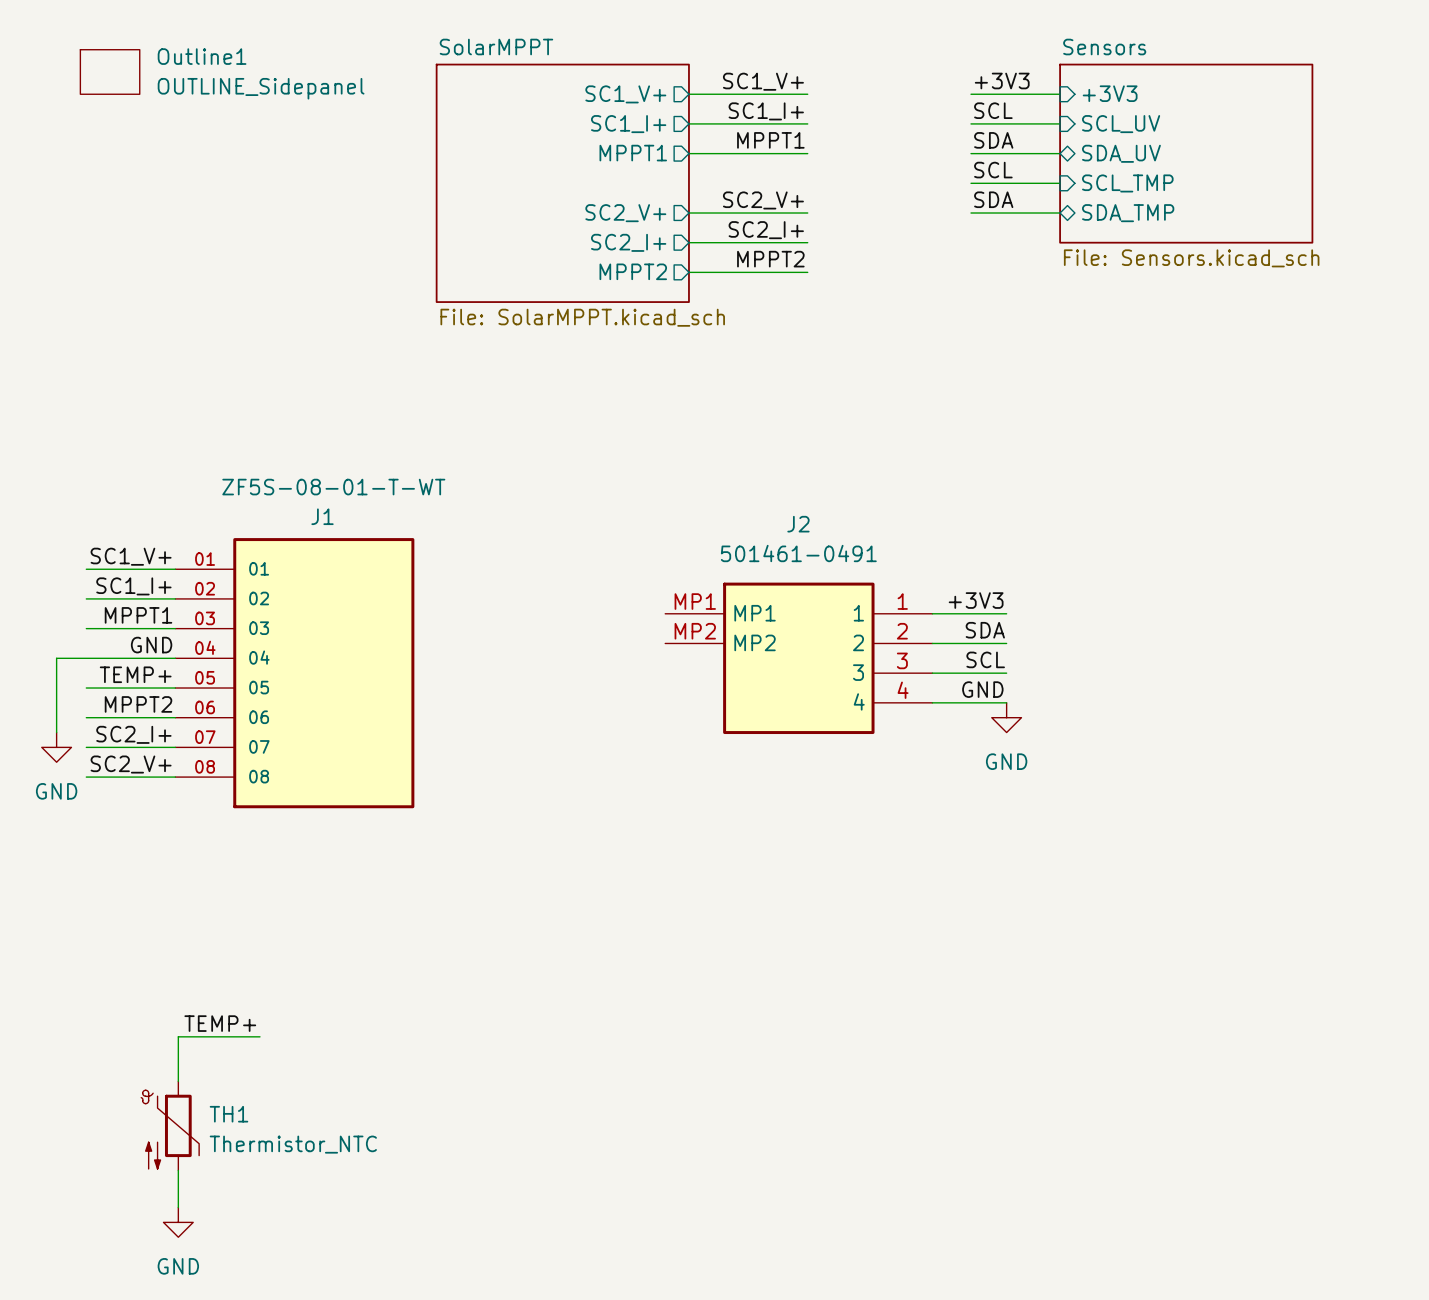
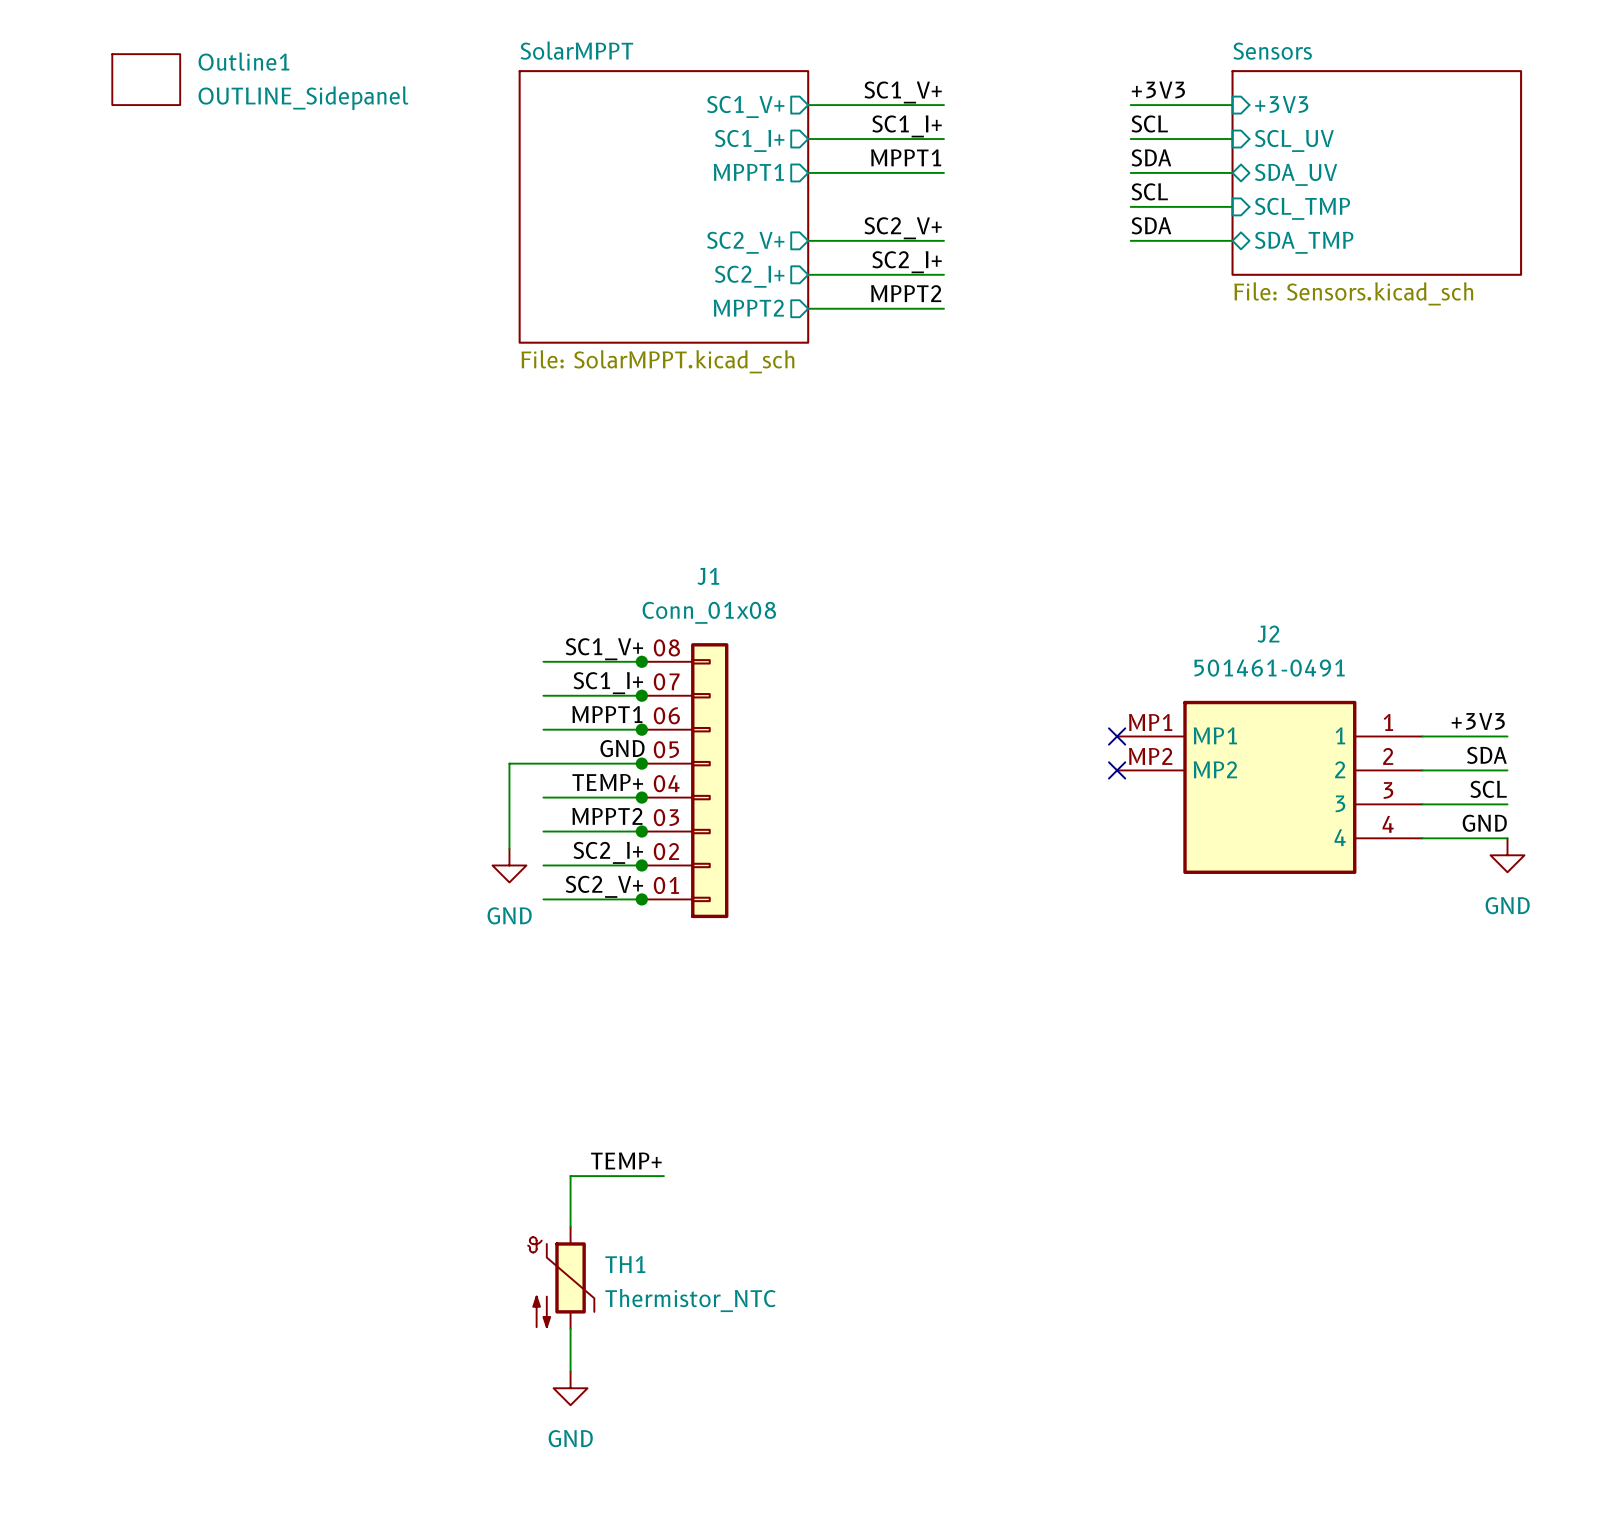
J1 value: ZF5S-08-01-T-WT (333, 487) -> Conn_01x08 (709, 612)
J1 name position: J1 (322, 516) -> J1 (708, 576)
J1 symbol: [175, 538, 415, 809] -> [641, 643, 729, 919]
label: SC1_V+ (131, 556) -> none
label: none -> SC1_V+ (604, 649)
wire: (86, 569) (175, 569) -> none
wire: none -> (543, 661) (645, 661)
junction: none -> (641, 661)
label: SC1_I+ (133, 586) -> none
wire: (86, 598) (175, 598) -> none
label: none -> SC1_I+ (608, 683)
label: +3V3 (976, 600) -> none
wire: none -> (543, 695) (645, 695)
junction: none -> (641, 695)
wire: (932, 613) (1006, 613) -> none
label: MPPT1 (138, 615) -> none
label: none -> MPPT1 (607, 714)
wire: (86, 628) (175, 628) -> none
label: SDA (985, 630) -> none
label: none -> +3V3 (1478, 721)
wire: none -> (543, 729) (645, 729)
junction: none -> (641, 729)
wire: (932, 643) (1006, 643) -> none
label: GND (151, 645) -> none
no-connect mark: none -> (1117, 736)
wire: none -> (1422, 736) (1507, 736)
label: none -> GND (622, 748)
wire: (175, 658) (56, 658) (56, 732) -> none
part: (798, 658) -> none
label: SCL (985, 659) -> none
label: none -> SDA (1486, 755)
junction: none -> (641, 763)
wire: none -> (645, 763) (509, 763) (509, 848)
wire: (932, 673) (1006, 673) -> none
label: TEMP+ (135, 674) -> none
no-connect mark: none -> (1117, 770)
wire: none -> (1422, 770) (1507, 770)
label: none -> TEMP+ (607, 782)
wire: (86, 688) (175, 688) -> none
label: GND (982, 689) -> none
part: none -> (1269, 787)
label: none -> SCL (1488, 789)
wire: none -> (543, 797) (645, 797)
junction: none -> (641, 797)
wire: (932, 702) (1006, 702) -> none
label: MPPT2 (138, 704) -> none
wire: none -> (1422, 804) (1507, 804)
label: none -> MPPT2 (607, 816)
wire: (86, 717) (175, 717) -> none
power symbol: GND (1006, 717) -> none
label: none -> GND (1484, 823)
wire: none -> (543, 831) (645, 831)
junction: none -> (641, 831)
label: SC2_I+ (133, 734) -> none
wire: none -> (1422, 838) (1507, 838)
label: none -> SC2_I+ (608, 852)
power symbol: GND (56, 747) -> none
wire: (86, 747) (175, 747) -> none
power symbol: none -> GND (1507, 855)
power symbol: none -> GND (509, 865)
wire: none -> (543, 865) (645, 865)
junction: none -> (641, 865)
label: SC2_V+ (131, 764) -> none
label: none -> SC2_V+ (604, 886)
wire: (86, 777) (175, 777) -> none
wire: none -> (543, 899) (645, 899)
junction: none -> (641, 899)
label: none -> TEMP+ (626, 1160)
label: TEMP+ (220, 1023) -> none
wire: none -> (663, 1176) (570, 1176) (570, 1227)
wire: (259, 1036) (178, 1036) (178, 1081) -> none
TH1 symbol: [141, 1081, 200, 1171] -> [528, 1227, 595, 1329]
wire: none -> (570, 1328) (570, 1371)
wire: (178, 1170) (178, 1207) -> none
power symbol: none -> GND (570, 1388)
power symbol: GND (178, 1222) -> none

